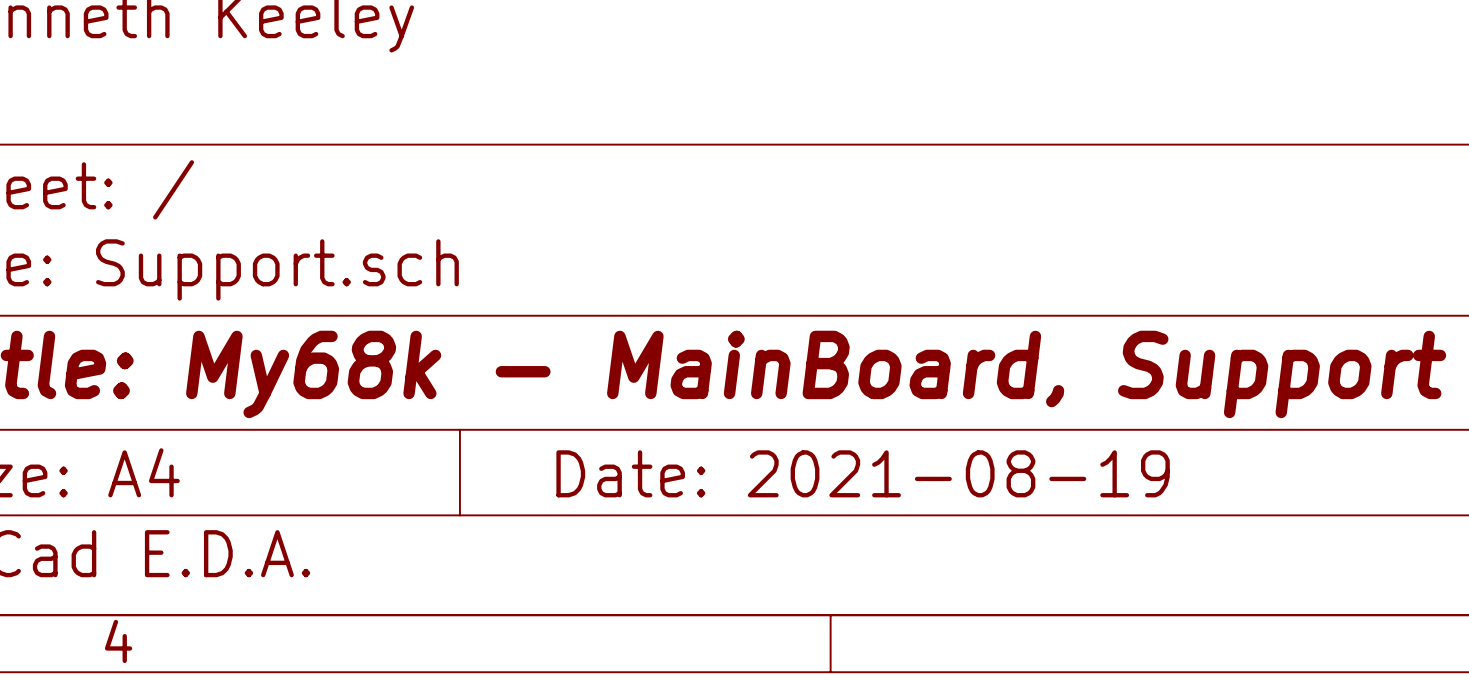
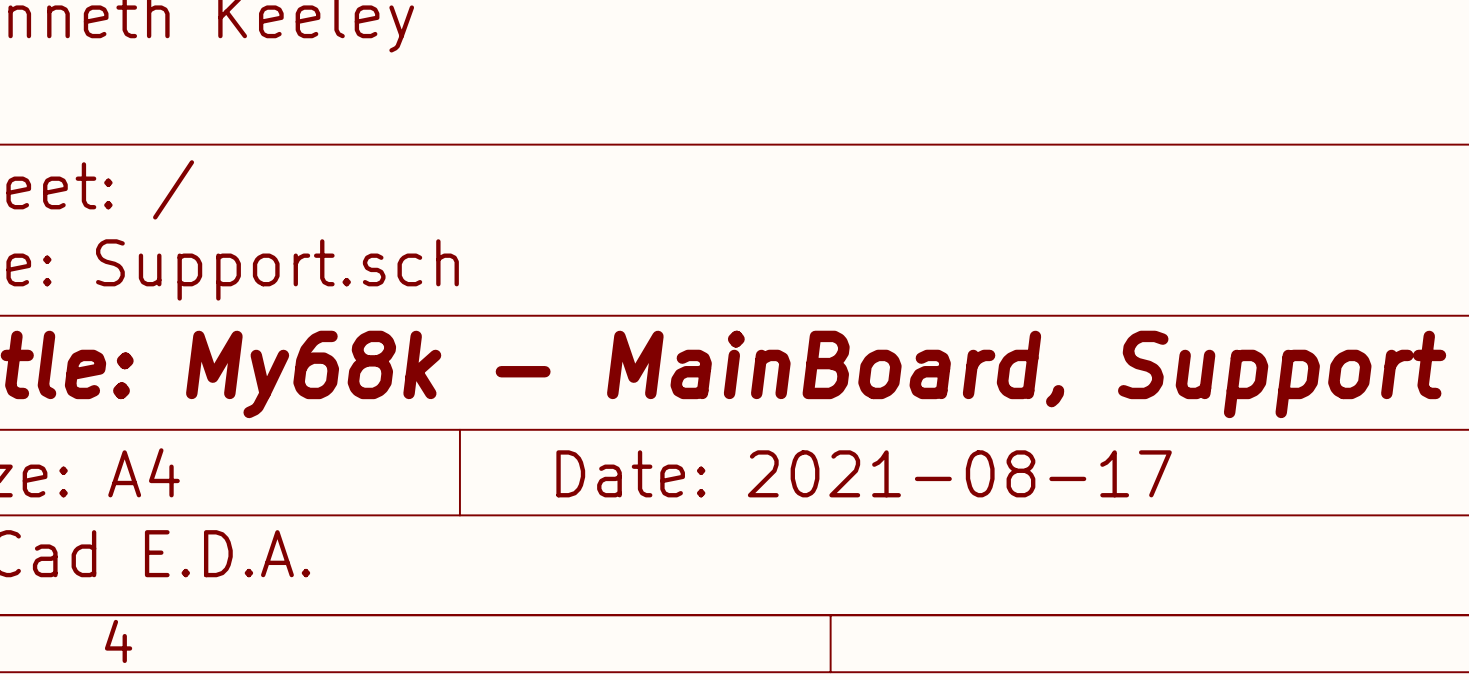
title block: Date: 2021-08-19 (863, 473) -> Date: 2021-08-17 (864, 473)

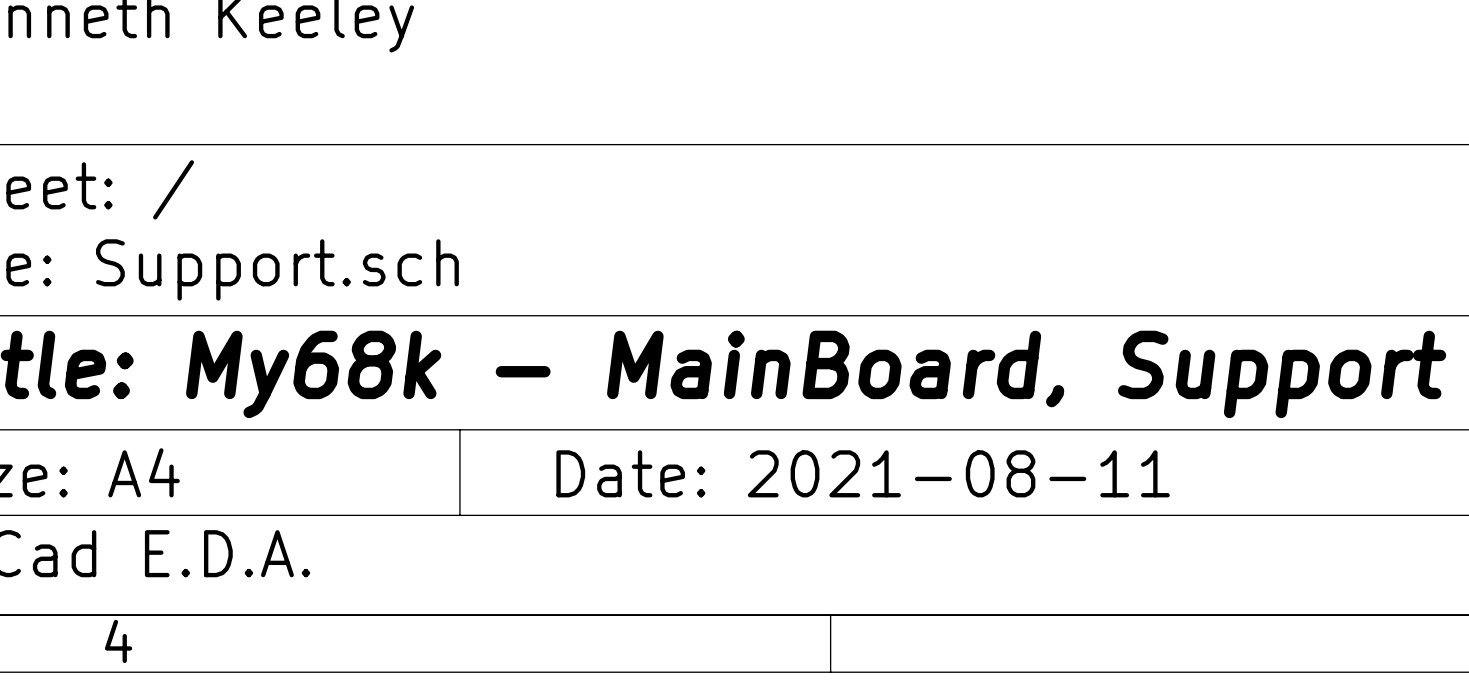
title block: Date: 2021-08-17 (864, 473) -> Date: 2021-08-11 (863, 473)

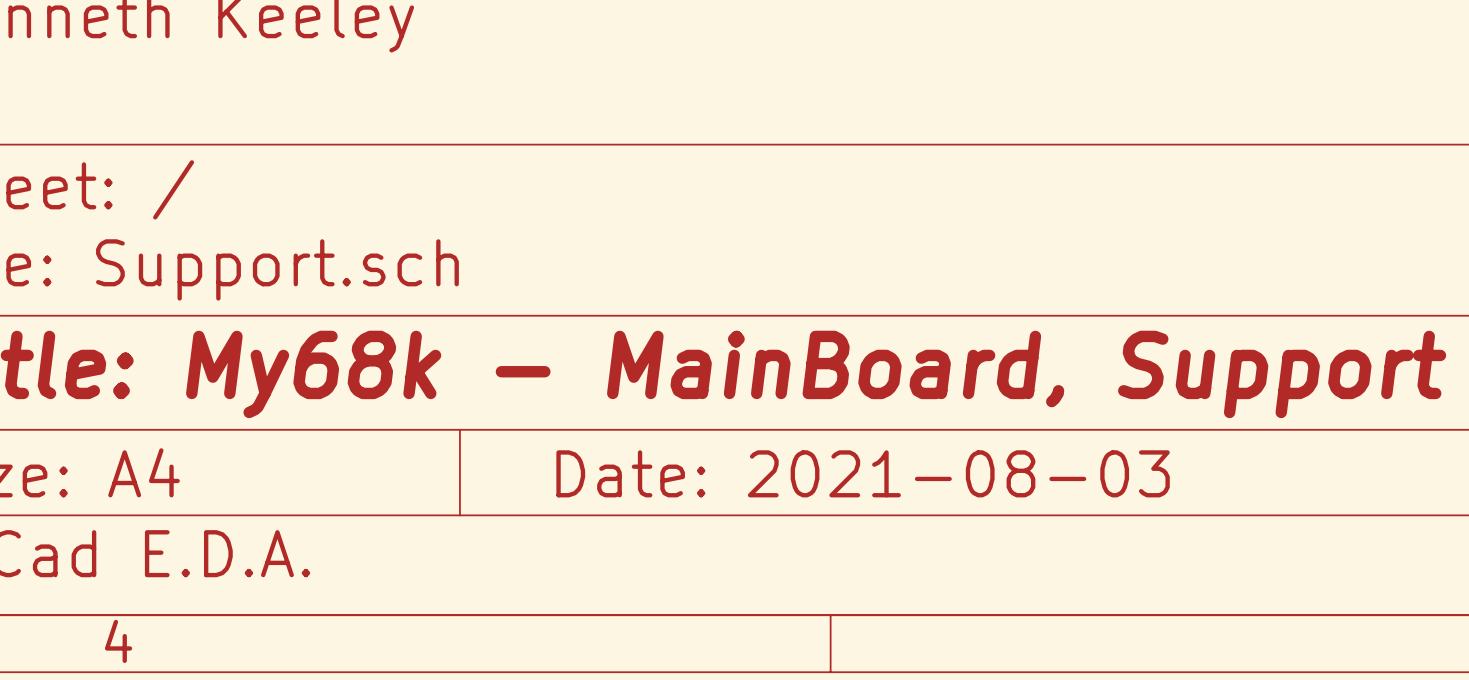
title block: Date: 2021-08-11 (863, 473) -> Date: 2021-08-03 (863, 473)

